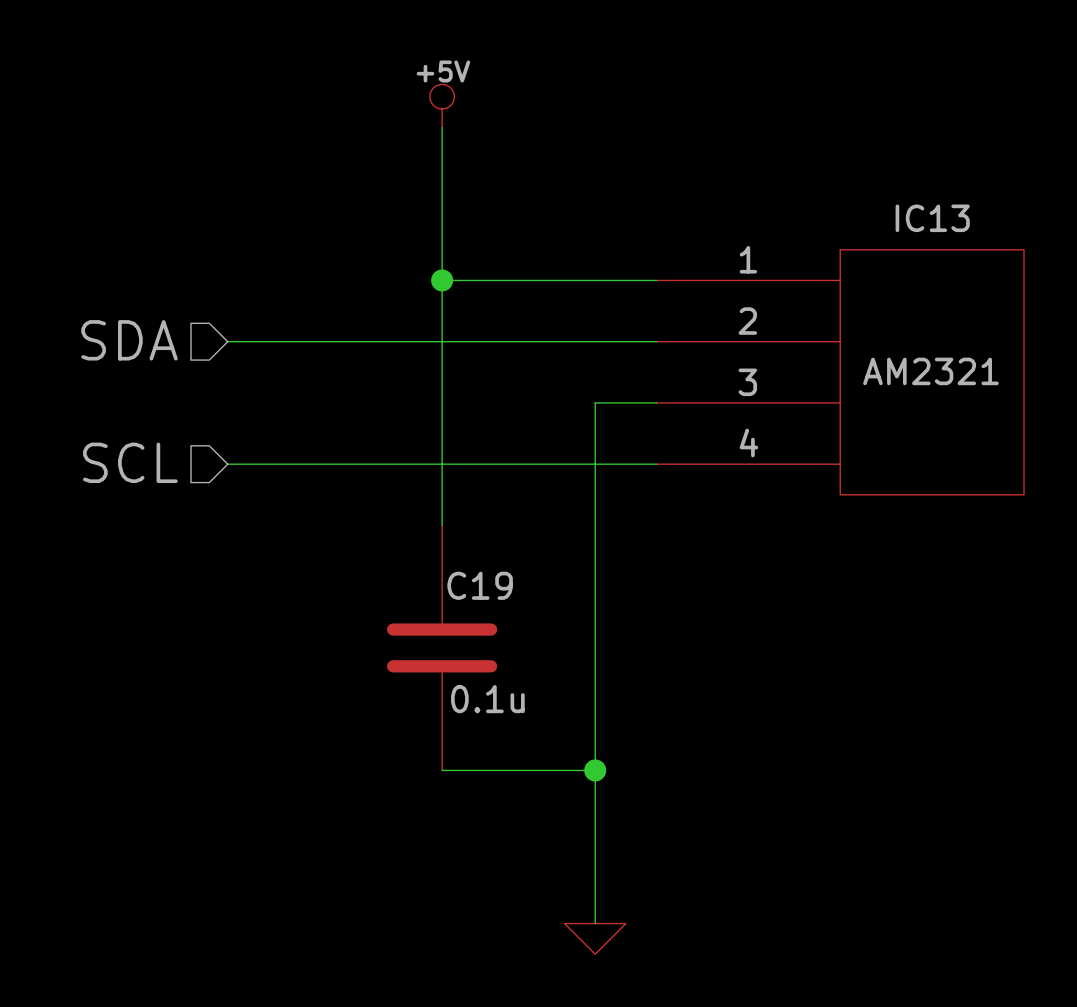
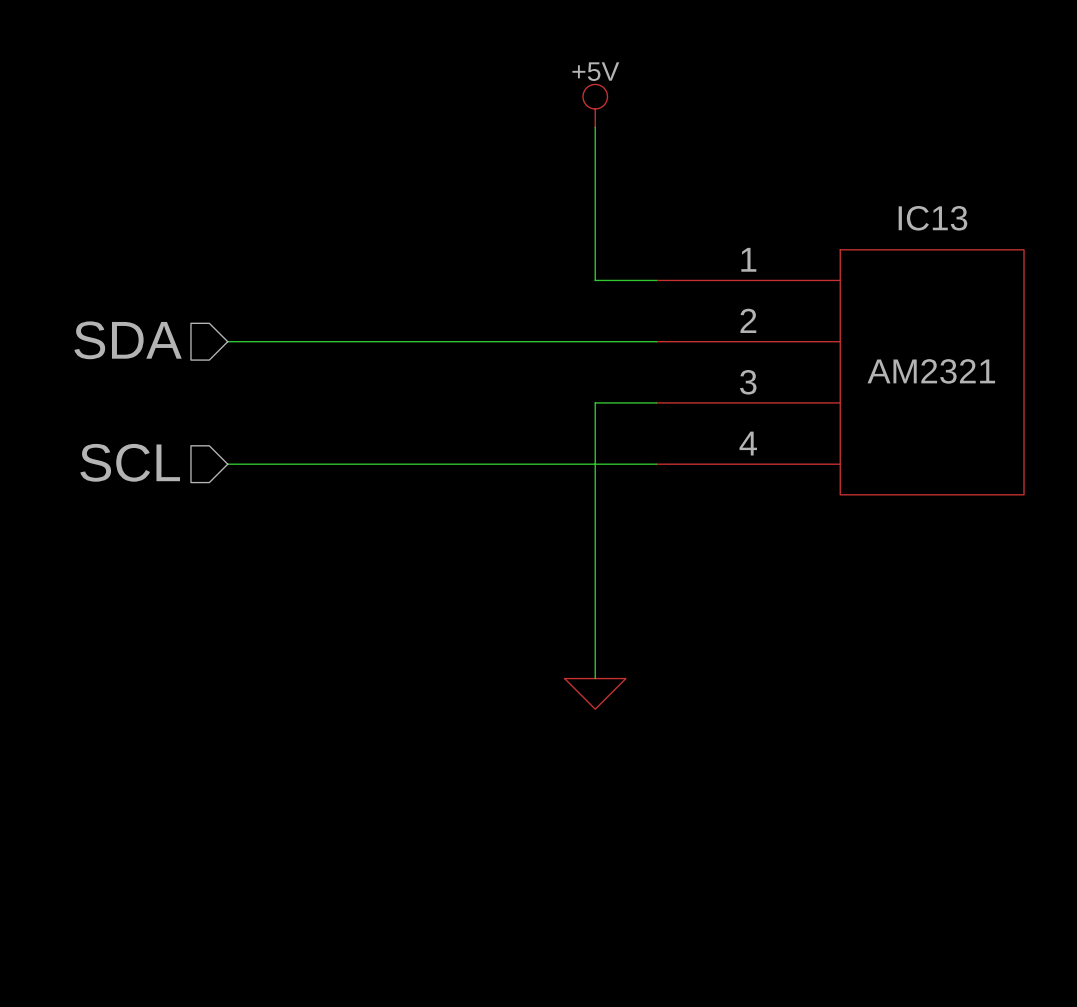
power symbol position: +5V (442, 105) -> +5V (595, 105)
wire: (442, 127) (442, 525) -> none
wire: (442, 280) (595, 280) -> (595, 127) (595, 280)
junction: (442, 280) -> none
C19: 0.1u (442, 647) -> none
wire: (595, 678) (595, 923) -> none
wire: (442, 770) (595, 770) -> none
junction: (595, 770) -> none
power symbol position: (595, 938) -> (595, 693)

